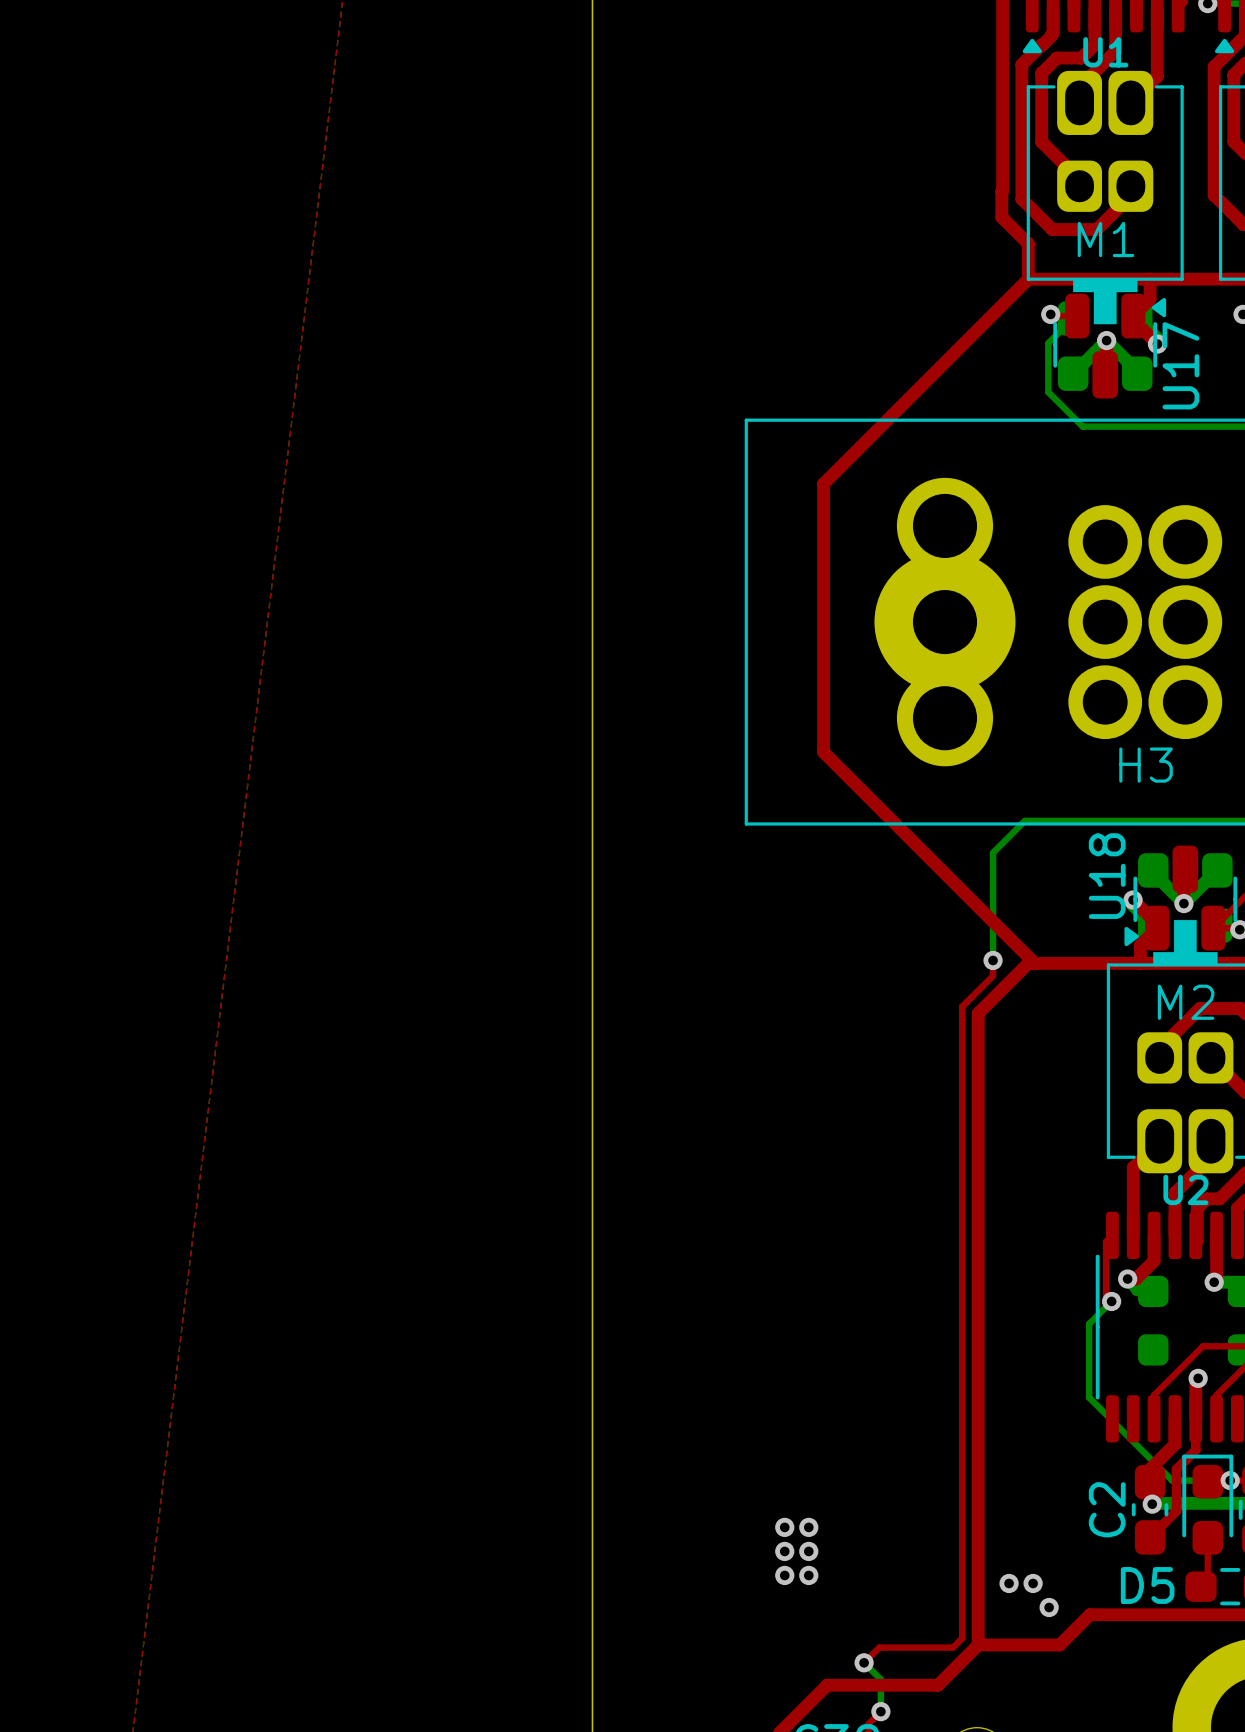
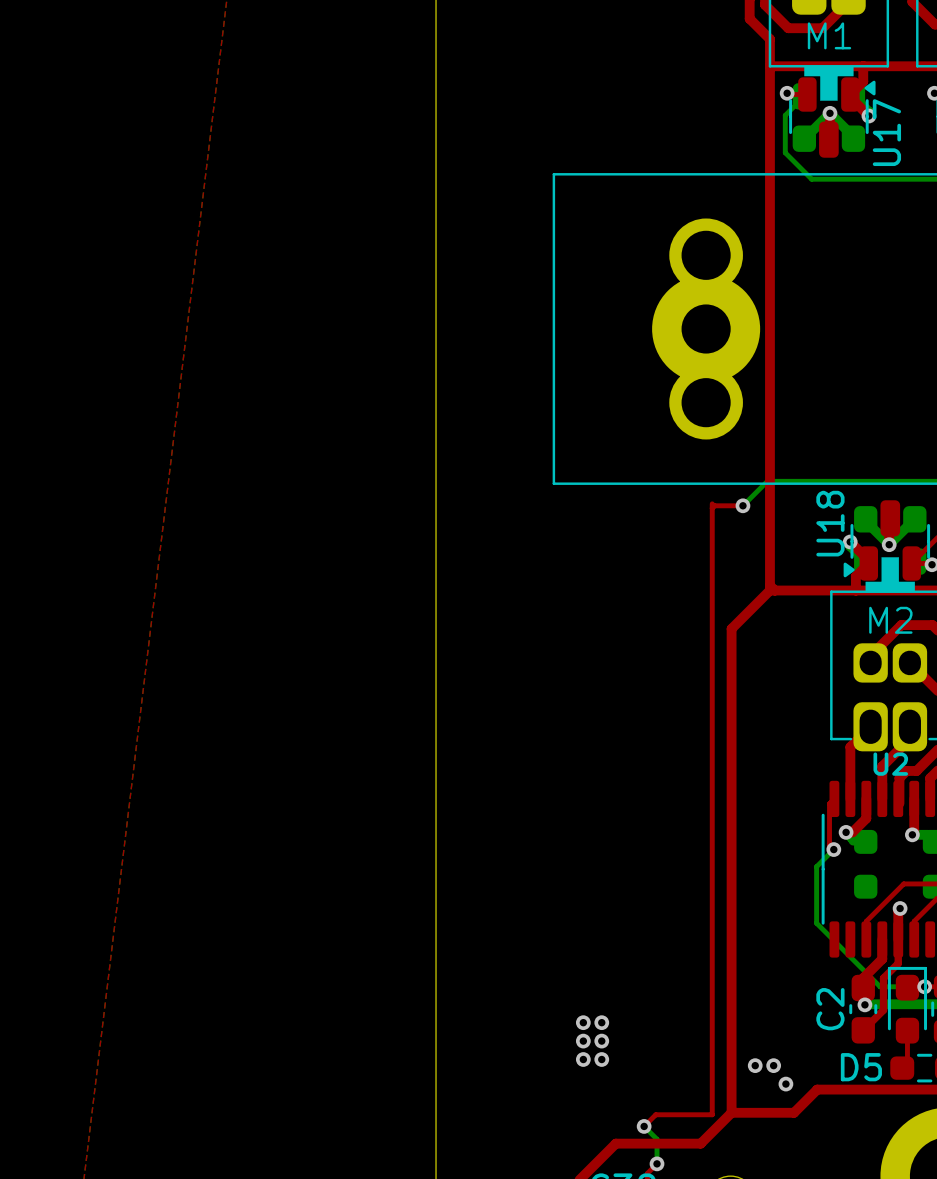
top track: (1028, 279) (823, 483) (823, 752) (1028, 956) -> (769, 66) (769, 585)
H3: (1145, 622) -> none
top track: none -> (742, 505) (714, 505) (712, 508)
bottom track: (993, 852) (993, 960) -> none
top track: (993, 960) (993, 975) (962, 1006) (962, 1638) (952, 1647) -> (712, 503) (712, 1114)
via position: (993, 960) -> (742, 505)

